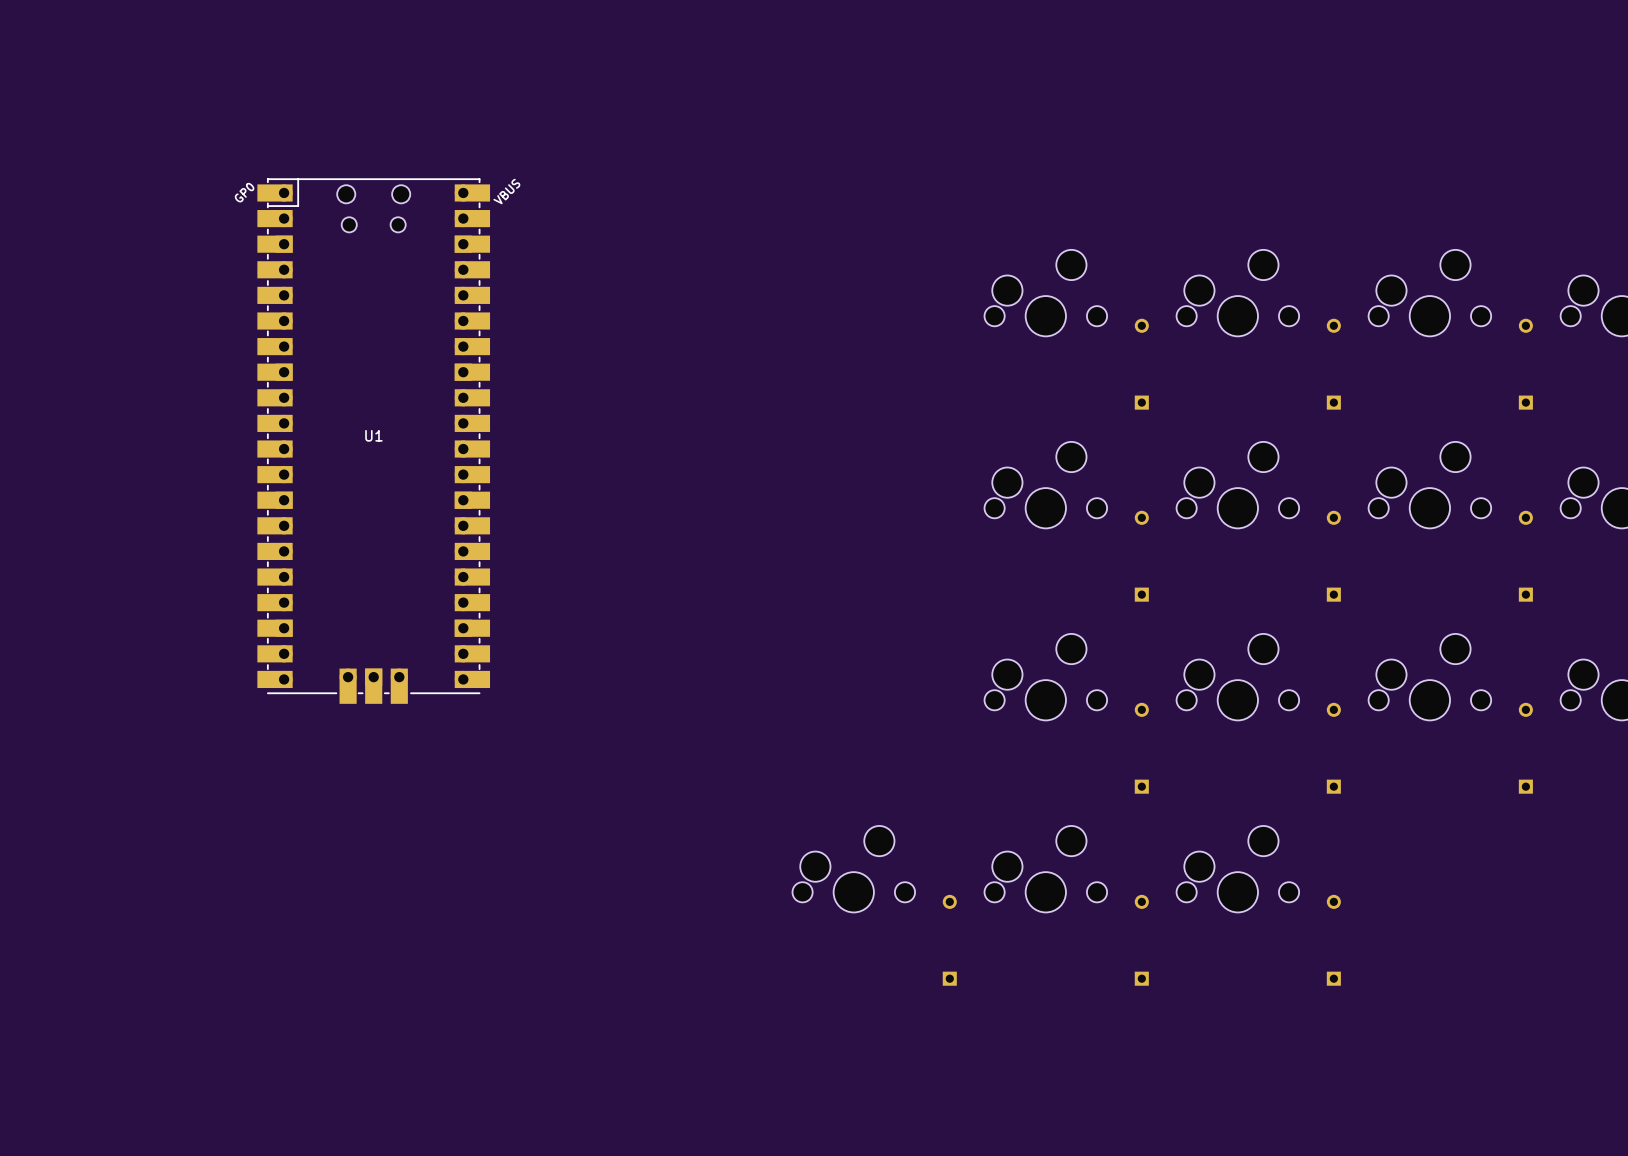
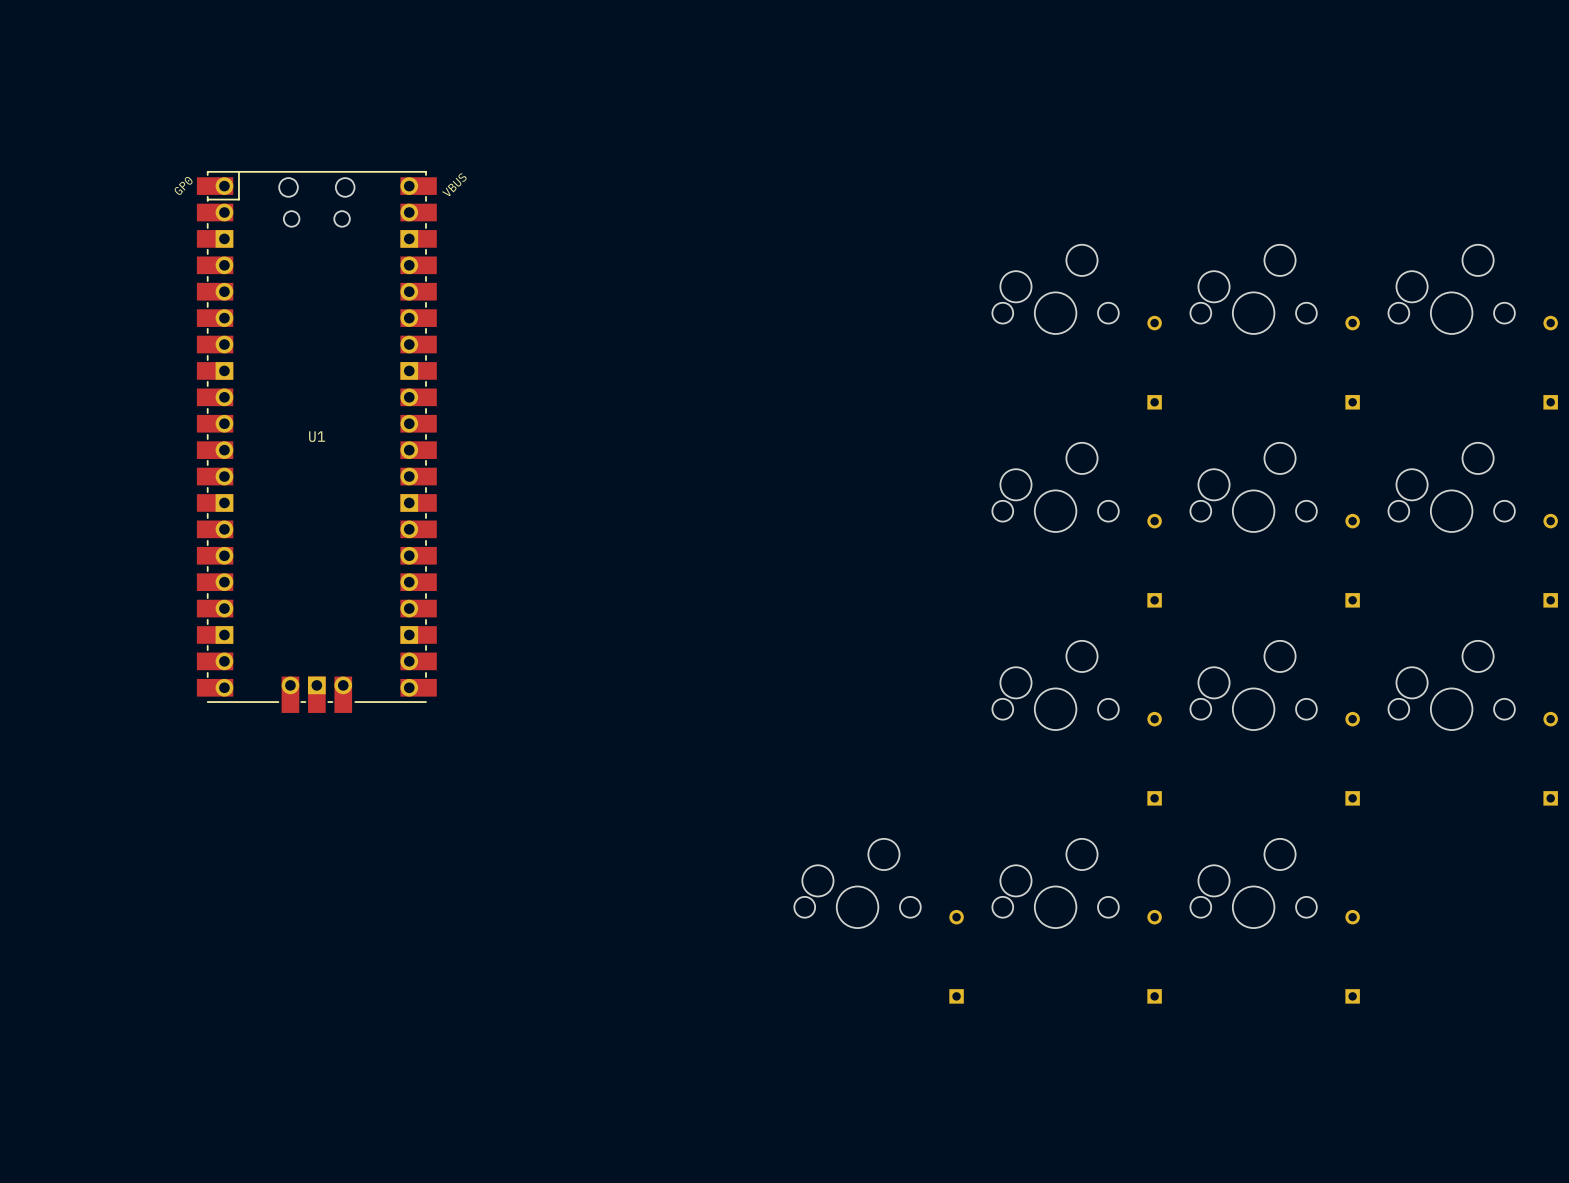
U1 position: (373, 441) -> (316, 442)

